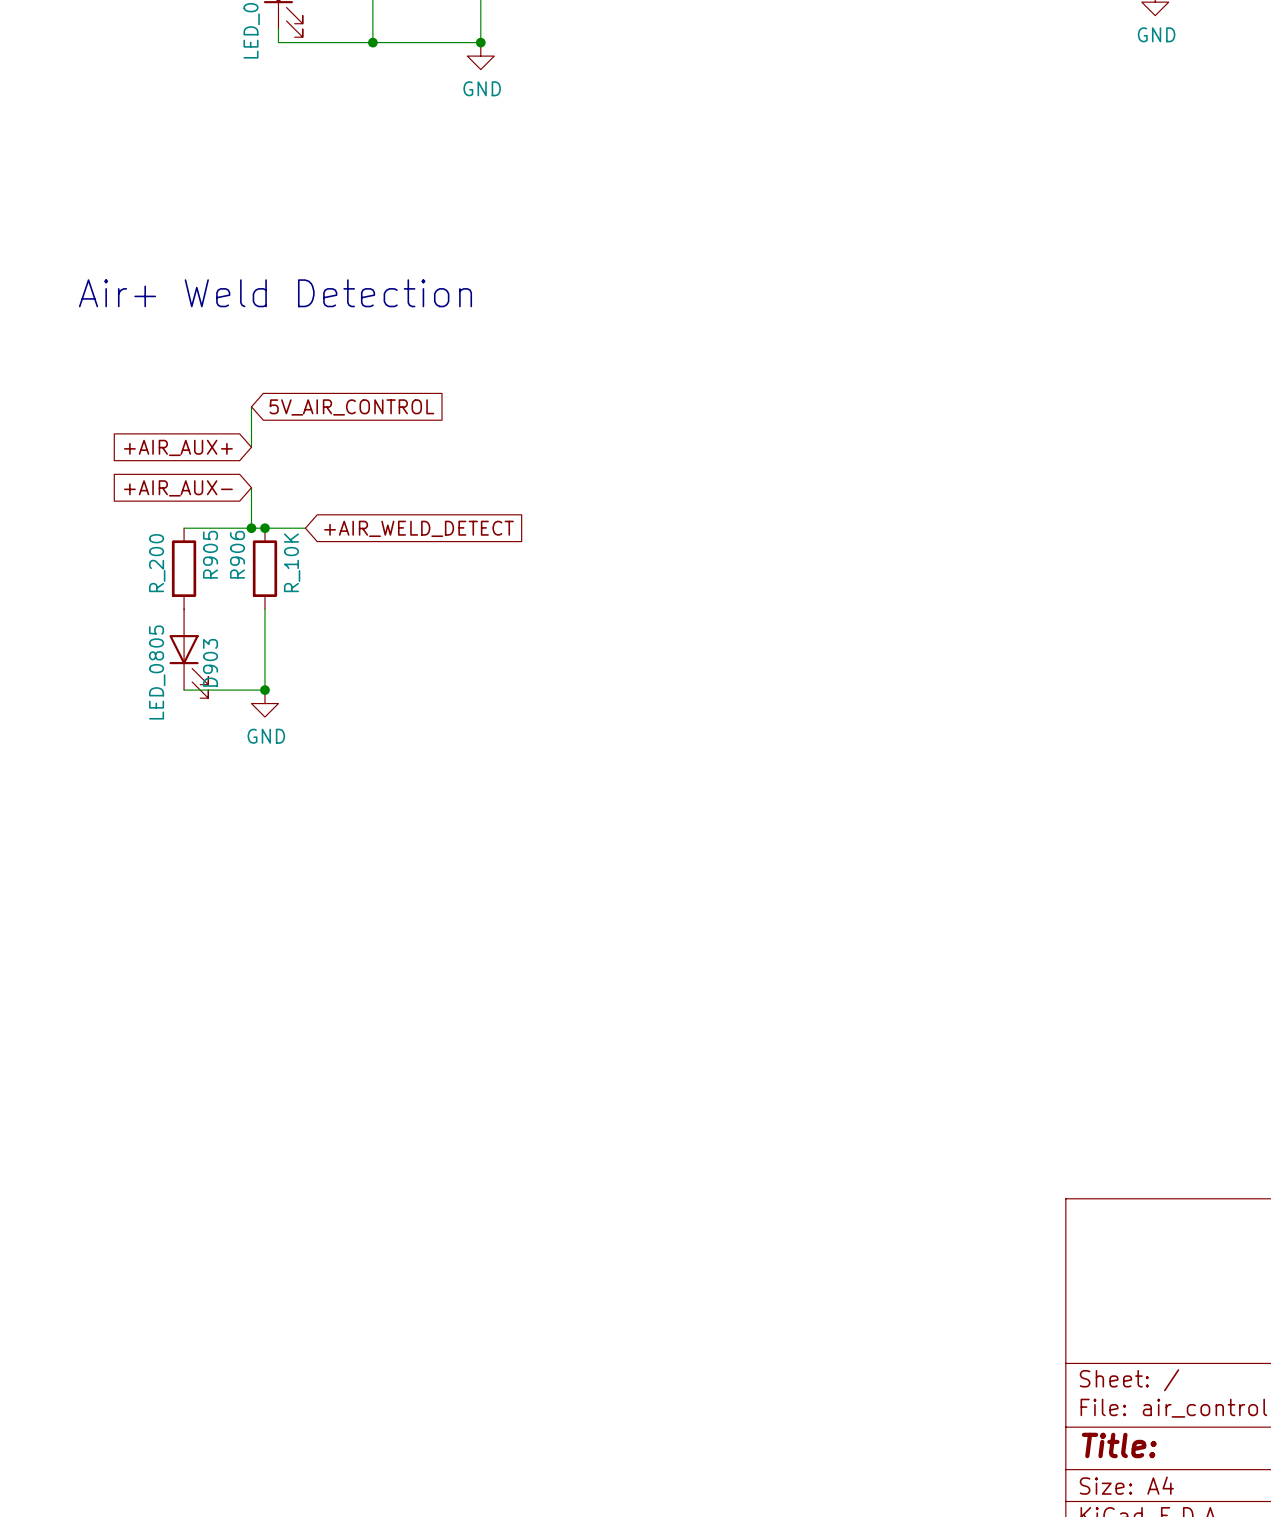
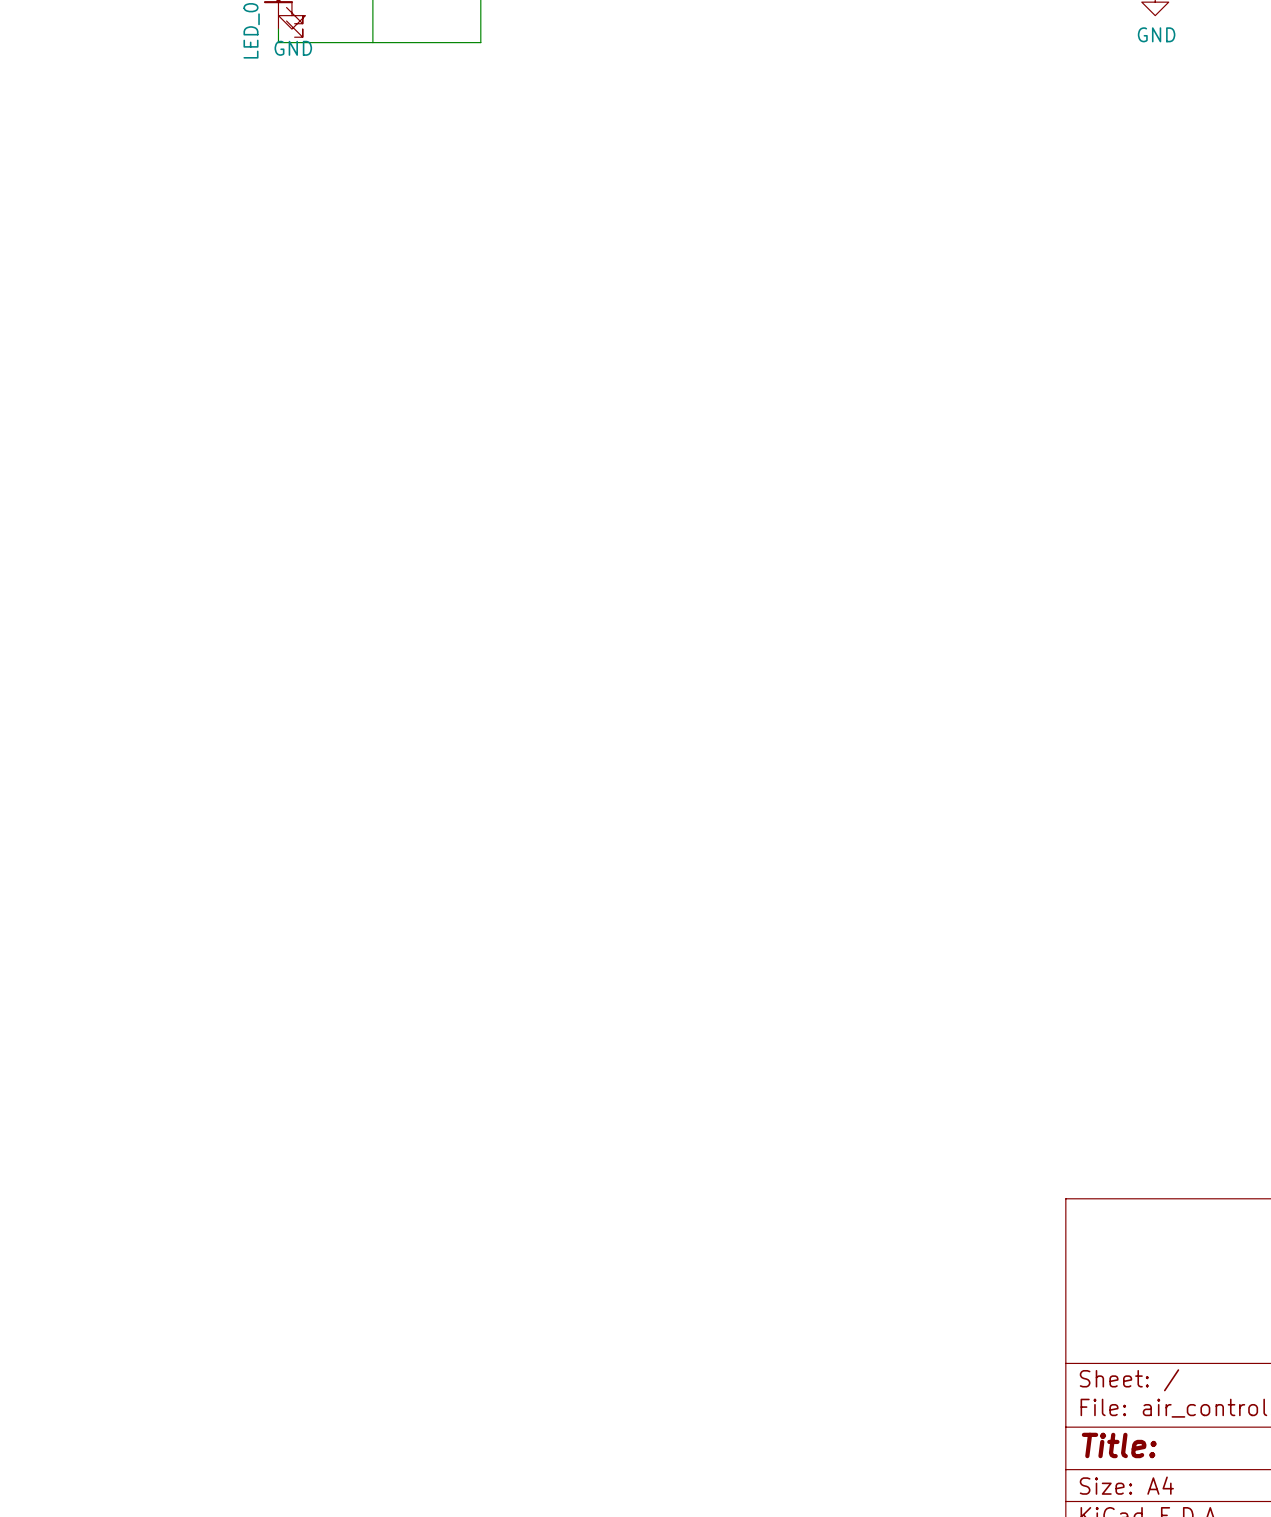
junction: (372, 42) -> none
junction: (480, 42) -> none
power symbol position: GND (480, 56) -> GND (291, 15)
text: Air+ Weld Detection (275, 293) -> none
wire: (251, 406) (251, 447) -> none
global label: 5V_AIR_CONTROL (351, 407) -> none
global label: +AIR_AUX+ (178, 447) -> none
wire: (251, 487) (251, 528) -> none
global label: +AIR_AUX- (178, 488) -> none
wire: (184, 528) (305, 528) -> none
junction: (251, 528) -> none
junction: (264, 528) -> none
global label: +AIR_WELD_DETECT (419, 528) -> none
R905: R_200 (184, 568) -> none
R906: R_10K (264, 568) -> none
wire: (264, 609) (264, 690) (184, 690) -> none
D903: LED_0805 (188, 653) -> none
junction: (264, 690) -> none
power symbol: GND (264, 703) -> none

